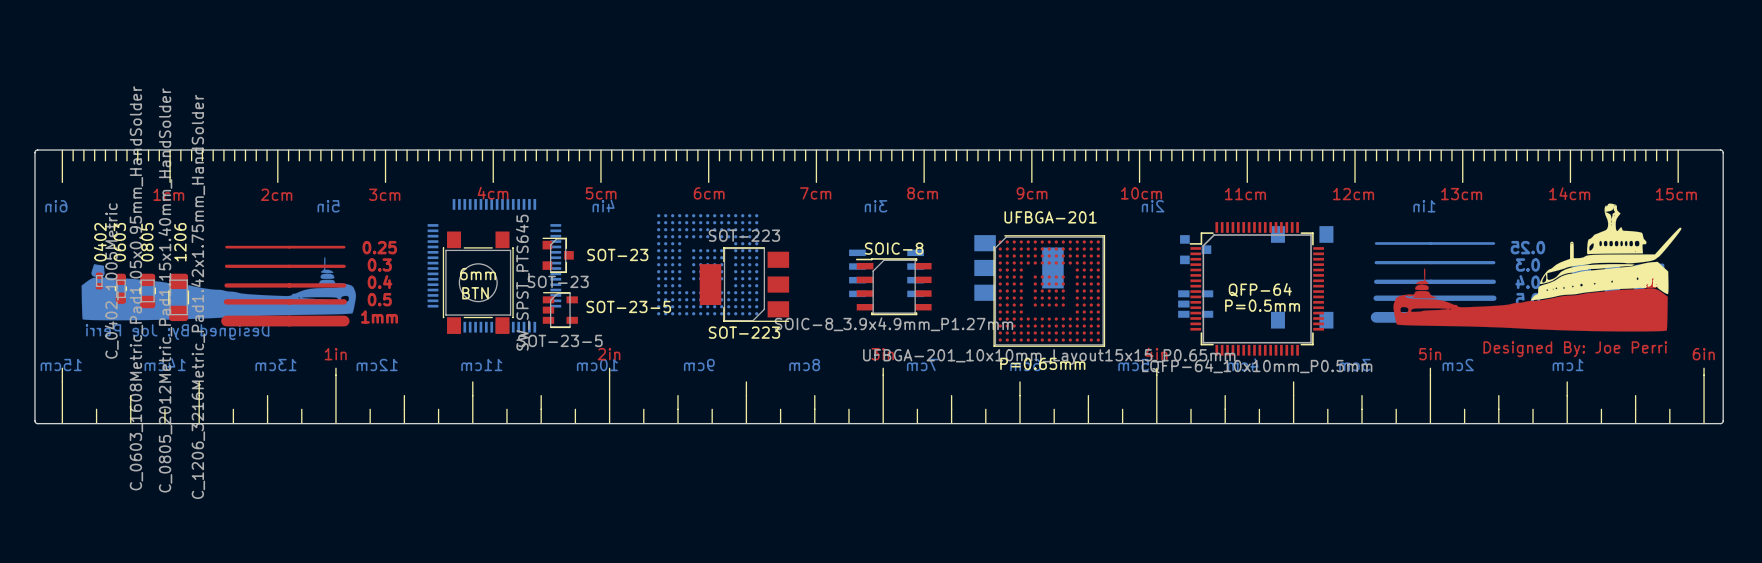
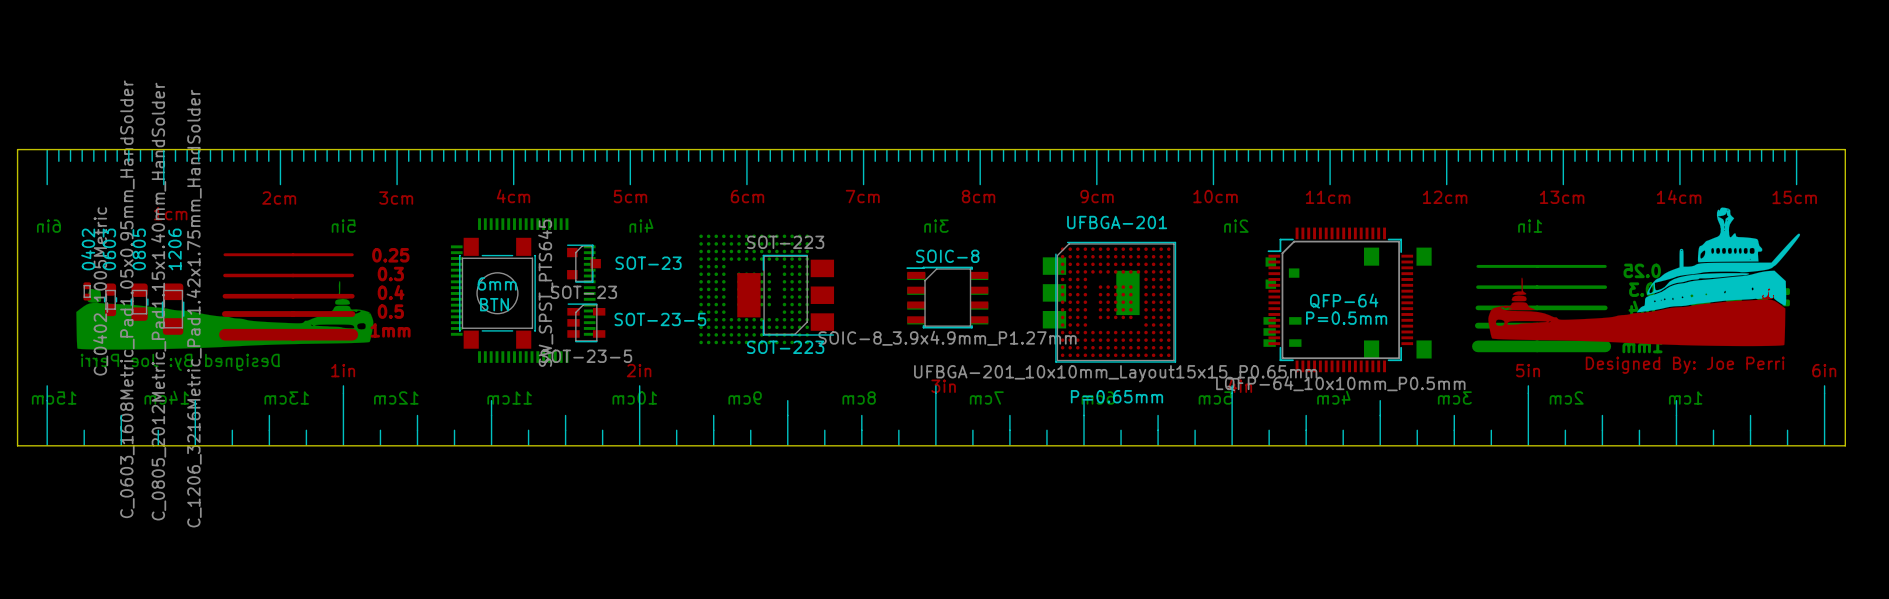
board edge: (37, 150) (1720, 150) (1723, 152) (1723, 421) (1720, 423) (37, 423) (34, 420) (35, 152) (37, 150) -> (17, 149) (17, 445) (1845, 445) (1845, 149) (17, 149)
line: (62, 150) (62, 182) -> (47, 149) (47, 184)
line: (73, 150) (73, 160) -> (58, 149) (58, 161)
line: (83, 150) (83, 160) -> (70, 149) (70, 161)
line: (94, 150) (94, 160) -> (82, 149) (82, 161)
line: (105, 150) (105, 160) -> (93, 149) (93, 161)
line: (116, 150) (116, 160) -> (105, 149) (105, 161)
line: (127, 150) (127, 160) -> (117, 149) (117, 161)
line: (137, 150) (137, 160) -> (128, 149) (128, 161)
line: (148, 150) (148, 160) -> (140, 149) (140, 161)
line: (159, 150) (159, 160) -> (152, 149) (152, 161)
line: (170, 150) (170, 182) -> (163, 149) (163, 184)
line: (180, 150) (180, 160) -> (175, 149) (175, 161)
line: (191, 150) (191, 160) -> (187, 149) (187, 161)
line: (202, 150) (202, 160) -> (198, 149) (198, 161)
line: (213, 150) (213, 160) -> (210, 149) (210, 161)
line: (223, 150) (223, 160) -> (222, 149) (222, 161)
line: (234, 150) (234, 160) -> (233, 149) (233, 161)
line: (245, 150) (245, 160) -> (245, 149) (245, 161)
line: (256, 150) (256, 160) -> (257, 149) (257, 161)
line: (267, 150) (267, 160) -> (268, 149) (268, 161)
line: (277, 150) (277, 182) -> (280, 149) (280, 184)
line: (288, 150) (288, 160) -> (292, 149) (292, 161)
line: (299, 150) (299, 160) -> (303, 149) (303, 161)
line: (310, 150) (310, 160) -> (315, 149) (315, 161)
line: (320, 150) (320, 160) -> (327, 149) (327, 161)
line: (331, 150) (331, 160) -> (338, 149) (338, 161)
line: (342, 150) (342, 160) -> (350, 149) (350, 161)
line: (353, 150) (353, 160) -> (362, 149) (362, 161)
line: (363, 150) (363, 160) -> (373, 149) (373, 161)
line: (374, 150) (374, 160) -> (385, 149) (385, 161)
line: (385, 150) (385, 182) -> (397, 149) (397, 184)
line: (396, 150) (396, 160) -> (408, 149) (408, 161)
line: (407, 150) (407, 160) -> (420, 149) (420, 161)
line: (417, 150) (417, 160) -> (432, 149) (432, 161)
line: (428, 150) (428, 160) -> (443, 149) (443, 161)
line: (439, 150) (439, 160) -> (455, 149) (455, 161)
line: (450, 150) (450, 160) -> (467, 149) (467, 161)
line: (460, 150) (460, 160) -> (478, 149) (478, 161)
line: (471, 150) (471, 160) -> (490, 149) (490, 161)
line: (482, 150) (482, 160) -> (502, 149) (502, 161)
line: (493, 150) (493, 182) -> (513, 149) (513, 184)
line: (504, 150) (504, 160) -> (525, 149) (525, 161)
line: (514, 150) (514, 160) -> (537, 149) (537, 161)
line: (525, 150) (525, 160) -> (548, 149) (548, 161)
line: (536, 150) (536, 160) -> (560, 149) (560, 161)
line: (547, 150) (547, 160) -> (572, 149) (572, 161)
line: (557, 150) (557, 160) -> (583, 149) (583, 161)
line: (568, 150) (568, 160) -> (595, 149) (595, 161)
line: (579, 150) (579, 160) -> (607, 149) (607, 161)
line: (590, 150) (590, 160) -> (618, 149) (618, 161)
line: (600, 150) (600, 182) -> (630, 149) (630, 184)
line: (611, 150) (611, 160) -> (641, 149) (641, 161)
line: (622, 150) (622, 160) -> (653, 149) (653, 161)
line: (633, 150) (633, 160) -> (665, 149) (665, 161)
line: (644, 150) (644, 160) -> (676, 149) (676, 161)
line: (654, 150) (654, 160) -> (688, 149) (688, 161)
line: (665, 150) (665, 160) -> (700, 149) (700, 161)
line: (676, 150) (676, 160) -> (711, 149) (711, 161)
line: (687, 150) (687, 160) -> (723, 149) (723, 161)
line: (697, 150) (697, 160) -> (735, 149) (735, 161)
line: (708, 150) (708, 182) -> (746, 149) (746, 184)
line: (719, 150) (719, 160) -> (758, 149) (758, 161)
line: (730, 150) (730, 160) -> (770, 149) (770, 161)
line: (741, 150) (741, 160) -> (781, 149) (781, 161)
line: (751, 150) (751, 160) -> (793, 149) (793, 161)
line: (762, 150) (762, 160) -> (805, 149) (805, 161)
line: (773, 150) (773, 160) -> (816, 149) (816, 161)
line: (784, 150) (784, 160) -> (828, 149) (828, 161)
line: (794, 150) (794, 160) -> (840, 149) (840, 161)
line: (805, 150) (805, 160) -> (851, 149) (851, 161)
line: (816, 150) (816, 182) -> (863, 149) (863, 184)
line: (827, 150) (827, 160) -> (875, 149) (875, 161)
line: (837, 150) (837, 160) -> (886, 149) (886, 161)
line: (848, 150) (848, 160) -> (898, 149) (898, 161)
line: (859, 150) (859, 160) -> (910, 149) (910, 161)
line: (870, 150) (870, 160) -> (921, 149) (921, 161)
line: (881, 150) (881, 160) -> (933, 149) (933, 161)
line: (891, 150) (891, 160) -> (945, 149) (945, 161)
line: (902, 150) (902, 160) -> (956, 149) (956, 161)
line: (913, 150) (913, 160) -> (968, 149) (968, 161)
line: (924, 150) (924, 182) -> (980, 149) (980, 184)
line: (934, 150) (934, 160) -> (991, 149) (991, 161)
line: (945, 150) (945, 160) -> (1003, 149) (1003, 161)
line: (956, 150) (956, 160) -> (1015, 149) (1015, 161)
line: (967, 150) (967, 160) -> (1026, 149) (1026, 161)
line: (977, 150) (977, 160) -> (1038, 149) (1038, 161)
line: (988, 150) (988, 160) -> (1050, 149) (1050, 161)
line: (999, 150) (999, 160) -> (1061, 149) (1061, 161)
line: (1010, 150) (1010, 160) -> (1073, 149) (1073, 161)
line: (1021, 150) (1021, 160) -> (1085, 149) (1085, 161)
line: (1031, 150) (1031, 182) -> (1096, 149) (1096, 184)
line: (1042, 150) (1042, 160) -> (1108, 149) (1108, 161)
line: (1053, 150) (1053, 160) -> (1120, 149) (1120, 161)
line: (1064, 150) (1064, 160) -> (1131, 149) (1131, 161)
line: (1074, 150) (1074, 160) -> (1143, 149) (1143, 161)
line: (1085, 150) (1085, 160) -> (1155, 149) (1155, 161)
line: (1096, 150) (1096, 160) -> (1166, 149) (1166, 161)
line: (1107, 150) (1107, 160) -> (1178, 149) (1178, 161)
line: (1118, 150) (1118, 160) -> (1190, 149) (1190, 161)
line: (1128, 150) (1128, 160) -> (1201, 149) (1201, 161)
line: (1139, 150) (1139, 182) -> (1213, 149) (1213, 184)
line: (1150, 150) (1150, 160) -> (1225, 149) (1225, 161)
line: (1161, 150) (1161, 160) -> (1236, 149) (1236, 161)
line: (1171, 150) (1171, 160) -> (1248, 149) (1248, 161)
line: (1182, 150) (1182, 160) -> (1260, 149) (1260, 161)
line: (1193, 150) (1193, 160) -> (1271, 149) (1271, 161)
line: (1204, 150) (1204, 160) -> (1283, 149) (1283, 161)
line: (1214, 150) (1214, 160) -> (1295, 149) (1295, 161)
line: (1225, 150) (1225, 160) -> (1306, 149) (1306, 161)
line: (1236, 150) (1236, 160) -> (1318, 149) (1318, 161)
line: (1247, 150) (1247, 182) -> (1330, 149) (1330, 184)
line: (1258, 150) (1258, 160) -> (1341, 149) (1341, 161)
line: (1268, 150) (1268, 160) -> (1353, 149) (1353, 161)
line: (1279, 150) (1279, 160) -> (1365, 149) (1365, 161)
line: (1290, 150) (1290, 160) -> (1376, 149) (1376, 161)
line: (1301, 150) (1301, 160) -> (1388, 149) (1388, 161)
line: (1311, 150) (1311, 160) -> (1400, 149) (1400, 161)
line: (1322, 150) (1322, 160) -> (1411, 149) (1411, 161)
line: (1333, 150) (1333, 160) -> (1423, 149) (1423, 161)
line: (1344, 150) (1344, 160) -> (1435, 149) (1435, 161)
line: (1355, 150) (1355, 182) -> (1446, 149) (1446, 184)
line: (1365, 150) (1365, 160) -> (1458, 149) (1458, 161)
line: (1376, 150) (1376, 160) -> (1470, 149) (1470, 161)
line: (1387, 150) (1387, 160) -> (1481, 149) (1481, 161)
line: (1398, 150) (1398, 160) -> (1493, 149) (1493, 161)
line: (1408, 150) (1408, 160) -> (1505, 149) (1505, 161)
line: (1419, 150) (1419, 160) -> (1516, 149) (1516, 161)
line: (1430, 150) (1430, 160) -> (1528, 149) (1528, 161)
line: (1441, 150) (1441, 160) -> (1540, 149) (1540, 161)
line: (1451, 150) (1451, 160) -> (1551, 149) (1551, 161)
line: (1462, 150) (1462, 182) -> (1563, 149) (1563, 184)
line: (1473, 150) (1473, 160) -> (1574, 149) (1574, 161)
line: (1484, 150) (1484, 160) -> (1586, 149) (1586, 161)
line: (1495, 150) (1495, 160) -> (1598, 149) (1598, 161)
line: (1505, 150) (1505, 160) -> (1609, 149) (1609, 161)
line: (1516, 150) (1516, 160) -> (1621, 149) (1621, 161)
line: (1527, 150) (1527, 160) -> (1633, 149) (1633, 161)
line: (1538, 150) (1538, 160) -> (1644, 149) (1644, 161)
line: (1548, 150) (1548, 160) -> (1656, 149) (1656, 161)
line: (1559, 150) (1559, 160) -> (1668, 149) (1668, 161)
line: (1570, 150) (1570, 182) -> (1679, 149) (1679, 184)
line: (1581, 150) (1581, 160) -> (1691, 149) (1691, 161)
line: (1591, 150) (1591, 160) -> (1703, 149) (1703, 161)
line: (1602, 150) (1602, 160) -> (1714, 149) (1714, 161)
line: (1613, 150) (1613, 160) -> (1726, 149) (1726, 161)
line: (1624, 150) (1624, 160) -> (1738, 149) (1738, 161)
line: (1635, 150) (1635, 160) -> (1749, 149) (1749, 161)
line: (1645, 150) (1645, 160) -> (1761, 149) (1761, 161)
line: (1656, 150) (1656, 160) -> (1773, 149) (1773, 161)
line: (1667, 150) (1667, 160) -> (1784, 149) (1784, 161)
line: (1678, 150) (1678, 182) -> (1796, 149) (1796, 184)
text position: 4cm (493, 193) -> 4cm (513, 196)
text position: 5cm (601, 193) -> 5cm (630, 196)
text position: 6cm (709, 193) -> 6cm (747, 196)
text position: 7cm (815, 193) -> 7cm (862, 196)
text position: 8cm (922, 193) -> 8cm (978, 196)
text position: 9cm (1032, 193) -> 9cm (1097, 196)
text position: 10cm (1141, 193) -> 10cm (1215, 196)
text position: 14cm (1569, 193) -> 14cm (1679, 197)
text position: 2cm (276, 194) -> 2cm (279, 198)
text position: 3cm (384, 194) -> 3cm (396, 198)
text position: 11cm (1245, 194) -> 11cm (1328, 197)
text position: 12cm (1353, 194) -> 12cm (1445, 197)
text position: 13cm (1461, 194) -> 13cm (1562, 197)
text position: 15cm (1676, 194) -> 15cm (1794, 197)
top track: (226, 247) (344, 247) -> (224, 254) (352, 254)
text position: 0.25 (379, 247) -> 0.25 (390, 255)
SOT-23 position: (558, 255) -> (583, 263)
text position: 0.3 (379, 264) -> 0.3 (390, 274)
top track: (226, 266) (344, 266) -> (224, 275) (352, 275)
drawing position: (1537, 267) -> (1644, 276)
0402 position: (99, 281) -> (87, 291)
text position: 0.4 (380, 282) -> 0.4 (391, 292)
6mm position: (478, 282) -> (497, 293)
SOT-223 position: (744, 284) -> (785, 295)
top track: (226, 285) (344, 285) -> (224, 296) (352, 296)
SOIC-8 position: (893, 286) -> (947, 297)
0603 position: (120, 288) -> (110, 299)
QFP-64 position: (1256, 288) -> (1340, 299)
0805 position: (147, 290) -> (139, 302)
UFBGA-201 position: (1049, 291) -> (1115, 302)
text position: BTN (475, 293) -> BTN (494, 304)
1206 position: (178, 297) -> (173, 309)
text position: 0.5 (379, 299) -> 0.5 (390, 311)
top track: (226, 301) (344, 301) -> (224, 313) (352, 313)
text position: P=0.5mm (1262, 305) -> P=0.5mm (1346, 318)
SOT-23-5 position: (560, 310) -> (586, 322)
text position: 1mm (379, 317) -> 1mm (390, 330)
top track: (226, 321) (344, 321) -> (224, 334) (352, 334)
text position: Designed By: Joe Perri (1575, 349) -> Designed By: Joe Perri (1685, 365)
text position: 1in (335, 354) -> 1in (343, 370)
text position: 2in (609, 354) -> 2in (639, 370)
text position: 5in (1430, 354) -> 5in (1528, 370)
text position: 6in (1703, 354) -> 6in (1824, 370)
line: (62, 368) (62, 422) -> (47, 385) (47, 445)
line: (335, 368) (335, 422) -> (343, 385) (343, 445)
line: (609, 368) (609, 422) -> (639, 385) (639, 445)
line: (883, 368) (883, 422) -> (935, 385) (935, 445)
line: (1156, 368) (1156, 422) -> (1232, 385) (1232, 445)
line: (1430, 368) (1430, 422) -> (1528, 385) (1528, 445)
line: (1704, 368) (1704, 422) -> (1824, 385) (1824, 445)
line: (199, 381) (199, 422) -> (195, 400) (195, 445)
line: (472, 381) (472, 422) -> (491, 400) (491, 445)
line: (746, 381) (746, 422) -> (787, 400) (787, 445)
line: (1020, 381) (1020, 422) -> (1084, 400) (1084, 445)
line: (1293, 381) (1293, 422) -> (1380, 400) (1380, 445)
line: (1567, 381) (1567, 422) -> (1676, 400) (1676, 445)
line: (130, 395) (130, 422) -> (121, 415) (121, 445)
line: (267, 395) (267, 422) -> (269, 415) (269, 445)
line: (404, 395) (404, 422) -> (417, 415) (417, 445)
line: (541, 395) (541, 422) -> (565, 415) (565, 445)
line: (677, 395) (677, 422) -> (713, 415) (713, 445)
line: (814, 395) (814, 422) -> (861, 415) (861, 445)
line: (951, 395) (951, 422) -> (1009, 415) (1009, 445)
line: (1088, 395) (1088, 422) -> (1158, 415) (1158, 445)
line: (1225, 395) (1225, 422) -> (1306, 415) (1306, 445)
line: (1362, 395) (1362, 422) -> (1454, 415) (1454, 445)
line: (1498, 395) (1498, 422) -> (1602, 415) (1602, 445)
line: (1635, 395) (1635, 422) -> (1750, 415) (1750, 445)
line: (96, 409) (96, 422) -> (84, 430) (84, 445)
line: (164, 409) (164, 422) -> (158, 430) (158, 445)
line: (233, 409) (233, 422) -> (232, 430) (232, 445)
line: (301, 409) (301, 422) -> (306, 430) (306, 445)
line: (370, 409) (370, 422) -> (380, 430) (380, 445)
line: (438, 409) (438, 422) -> (454, 430) (454, 445)
line: (506, 409) (506, 422) -> (528, 430) (528, 445)
line: (575, 409) (575, 422) -> (602, 430) (602, 445)
line: (643, 409) (643, 422) -> (676, 430) (676, 445)
line: (712, 409) (712, 422) -> (750, 430) (750, 445)
line: (780, 409) (780, 422) -> (824, 430) (824, 445)
line: (848, 409) (848, 422) -> (898, 430) (898, 445)
line: (917, 409) (917, 422) -> (972, 430) (972, 445)
line: (985, 409) (985, 422) -> (1046, 430) (1046, 445)
line: (1054, 409) (1054, 422) -> (1121, 430) (1121, 445)
line: (1122, 409) (1122, 422) -> (1195, 430) (1195, 445)
line: (1191, 409) (1191, 422) -> (1269, 430) (1269, 445)
line: (1259, 409) (1259, 422) -> (1343, 430) (1343, 445)
line: (1327, 409) (1327, 422) -> (1417, 430) (1417, 445)
line: (1396, 409) (1396, 422) -> (1491, 430) (1491, 445)
line: (1464, 409) (1464, 422) -> (1565, 430) (1565, 445)
line: (1533, 409) (1533, 422) -> (1639, 430) (1639, 445)
line: (1601, 409) (1601, 422) -> (1713, 430) (1713, 445)
line: (1669, 409) (1669, 422) -> (1787, 430) (1787, 445)

